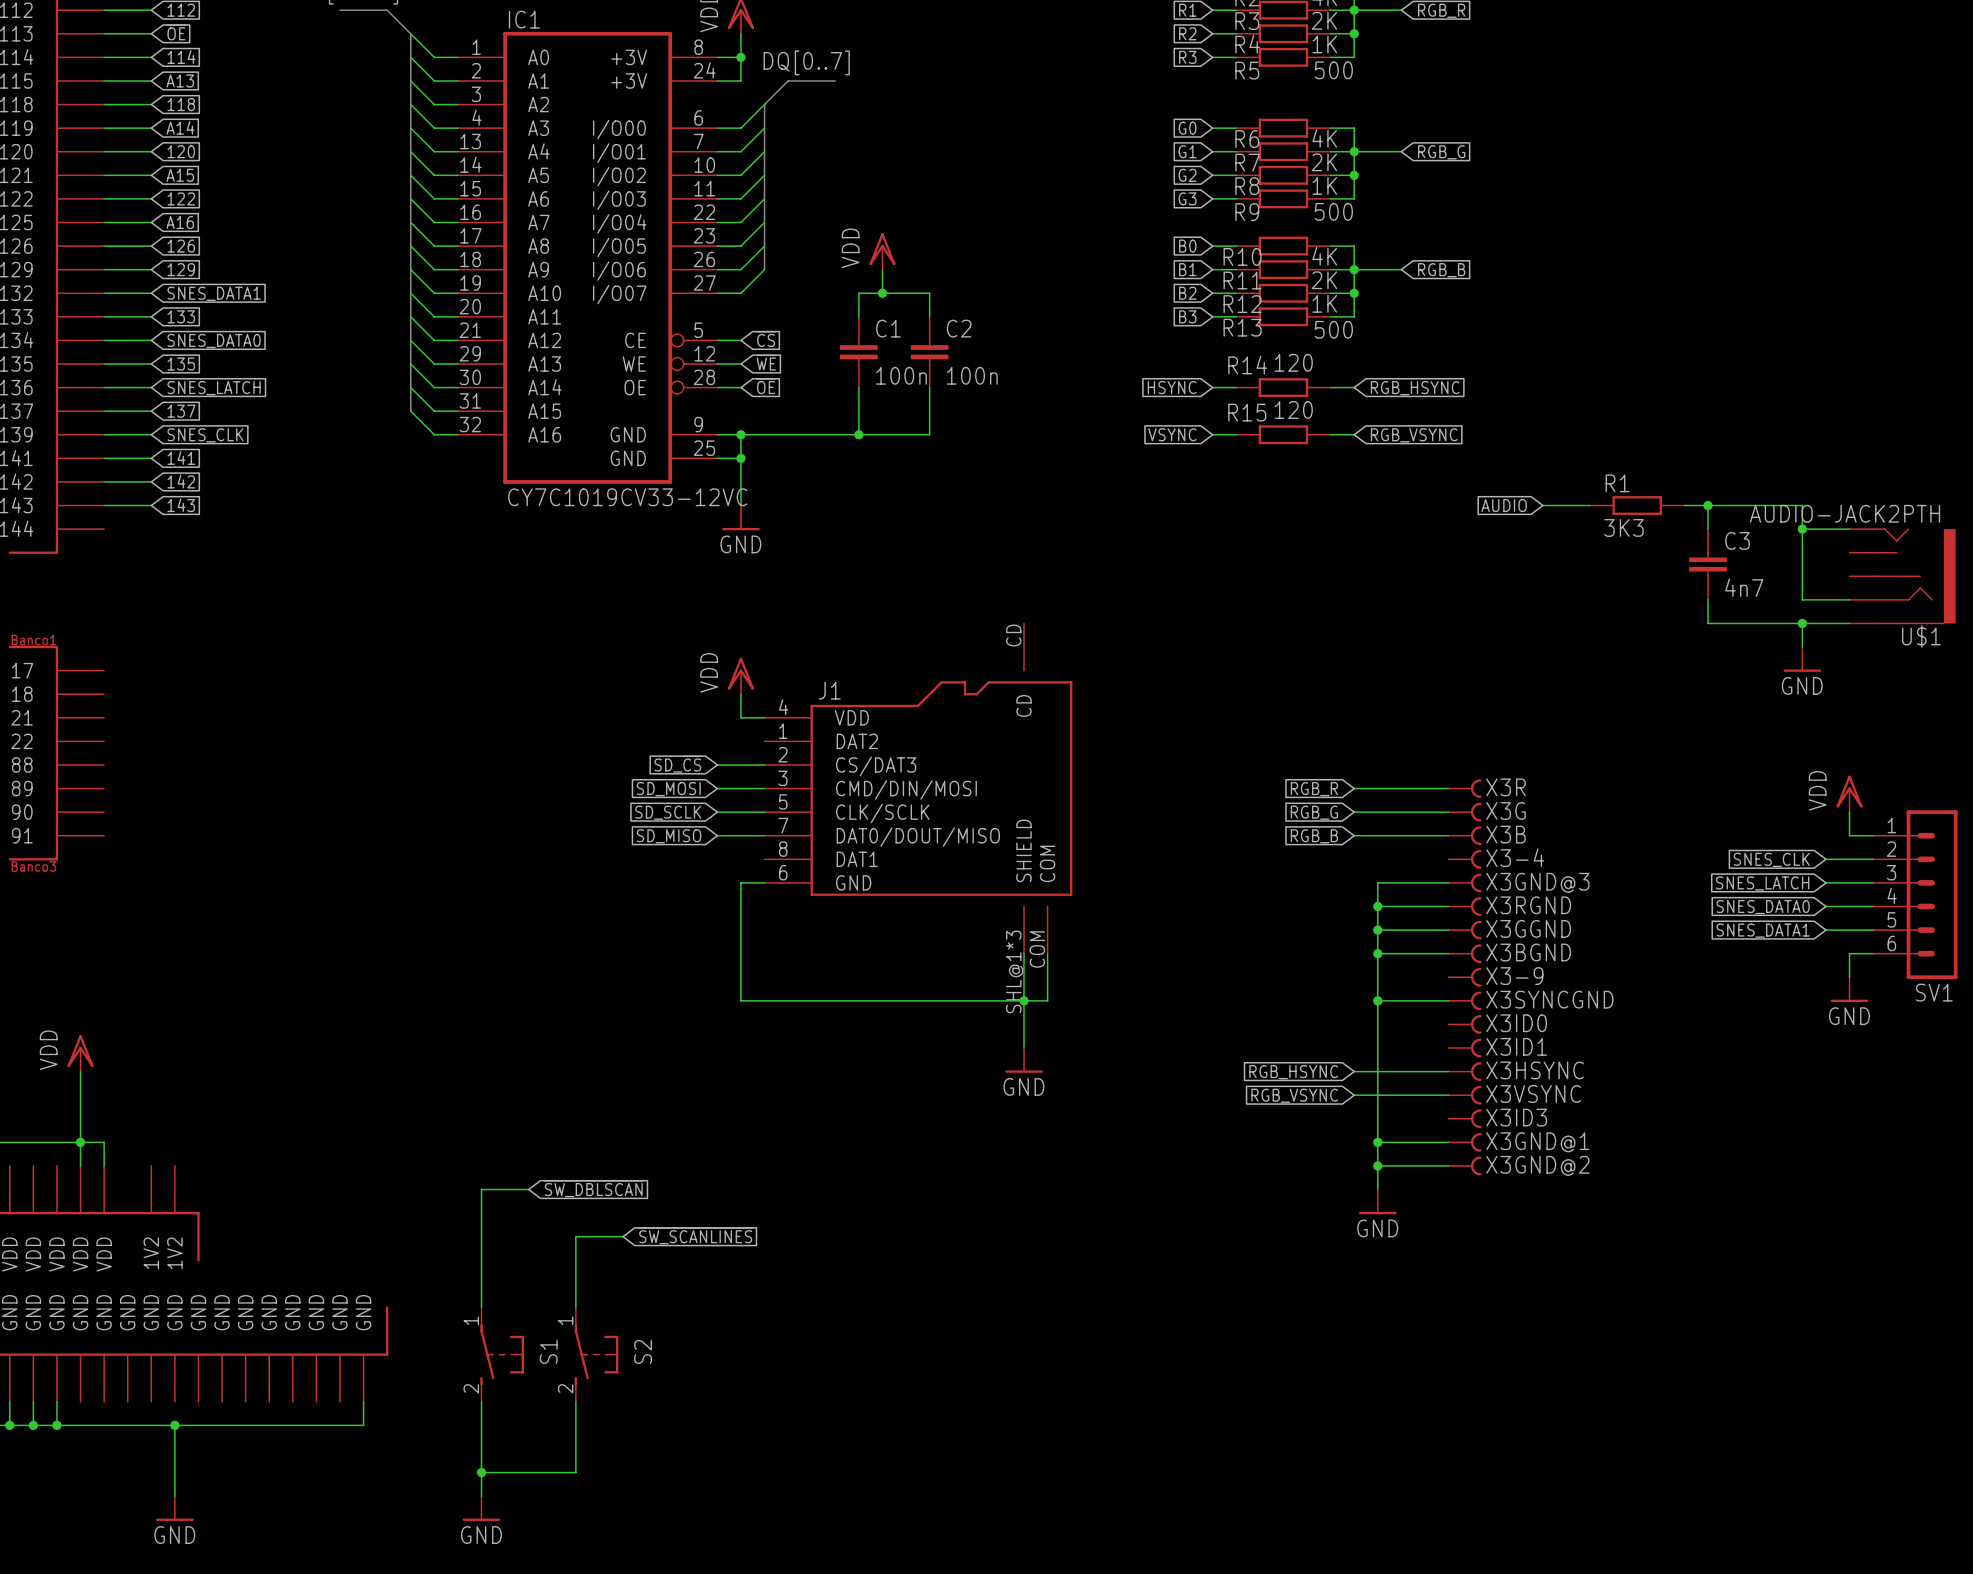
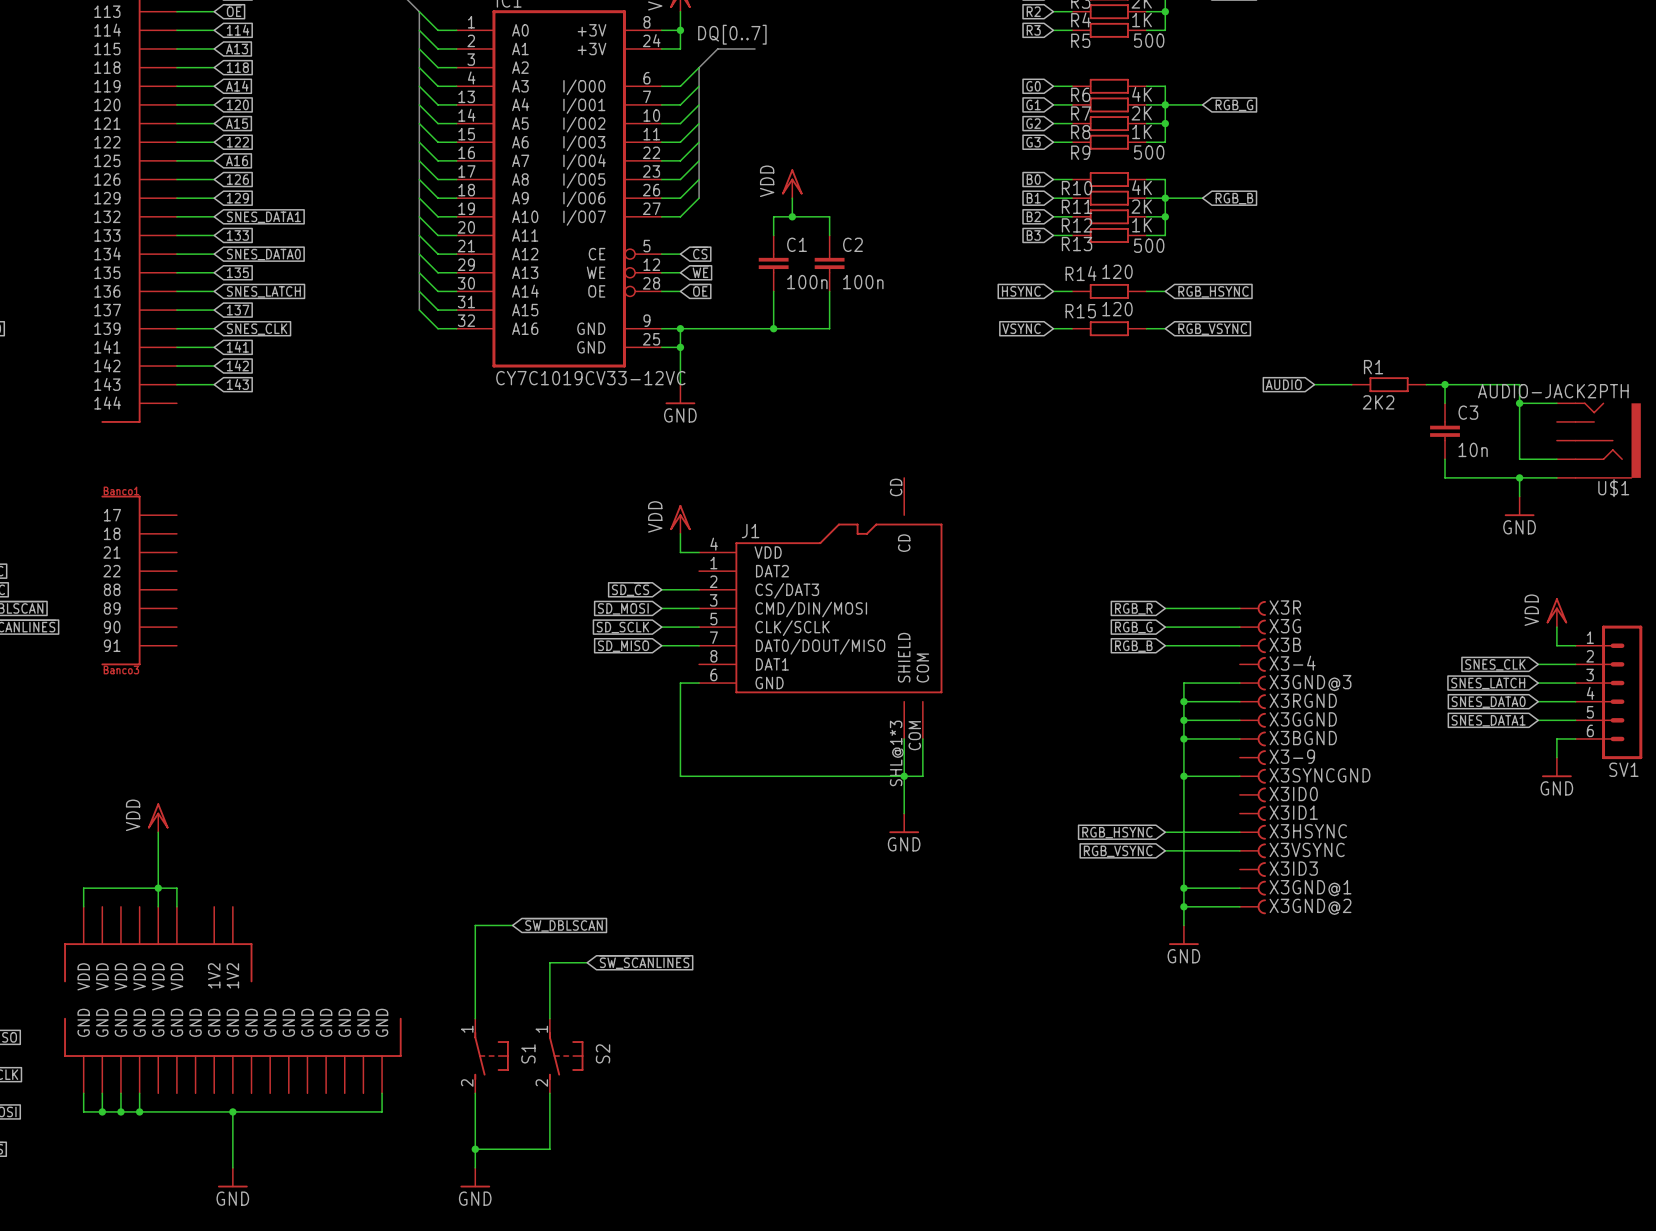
R1 value: 3K3 (1623, 527) -> 2K2 (1378, 402)
C3 value: 4n7 (1744, 587) -> 10n (1473, 449)

